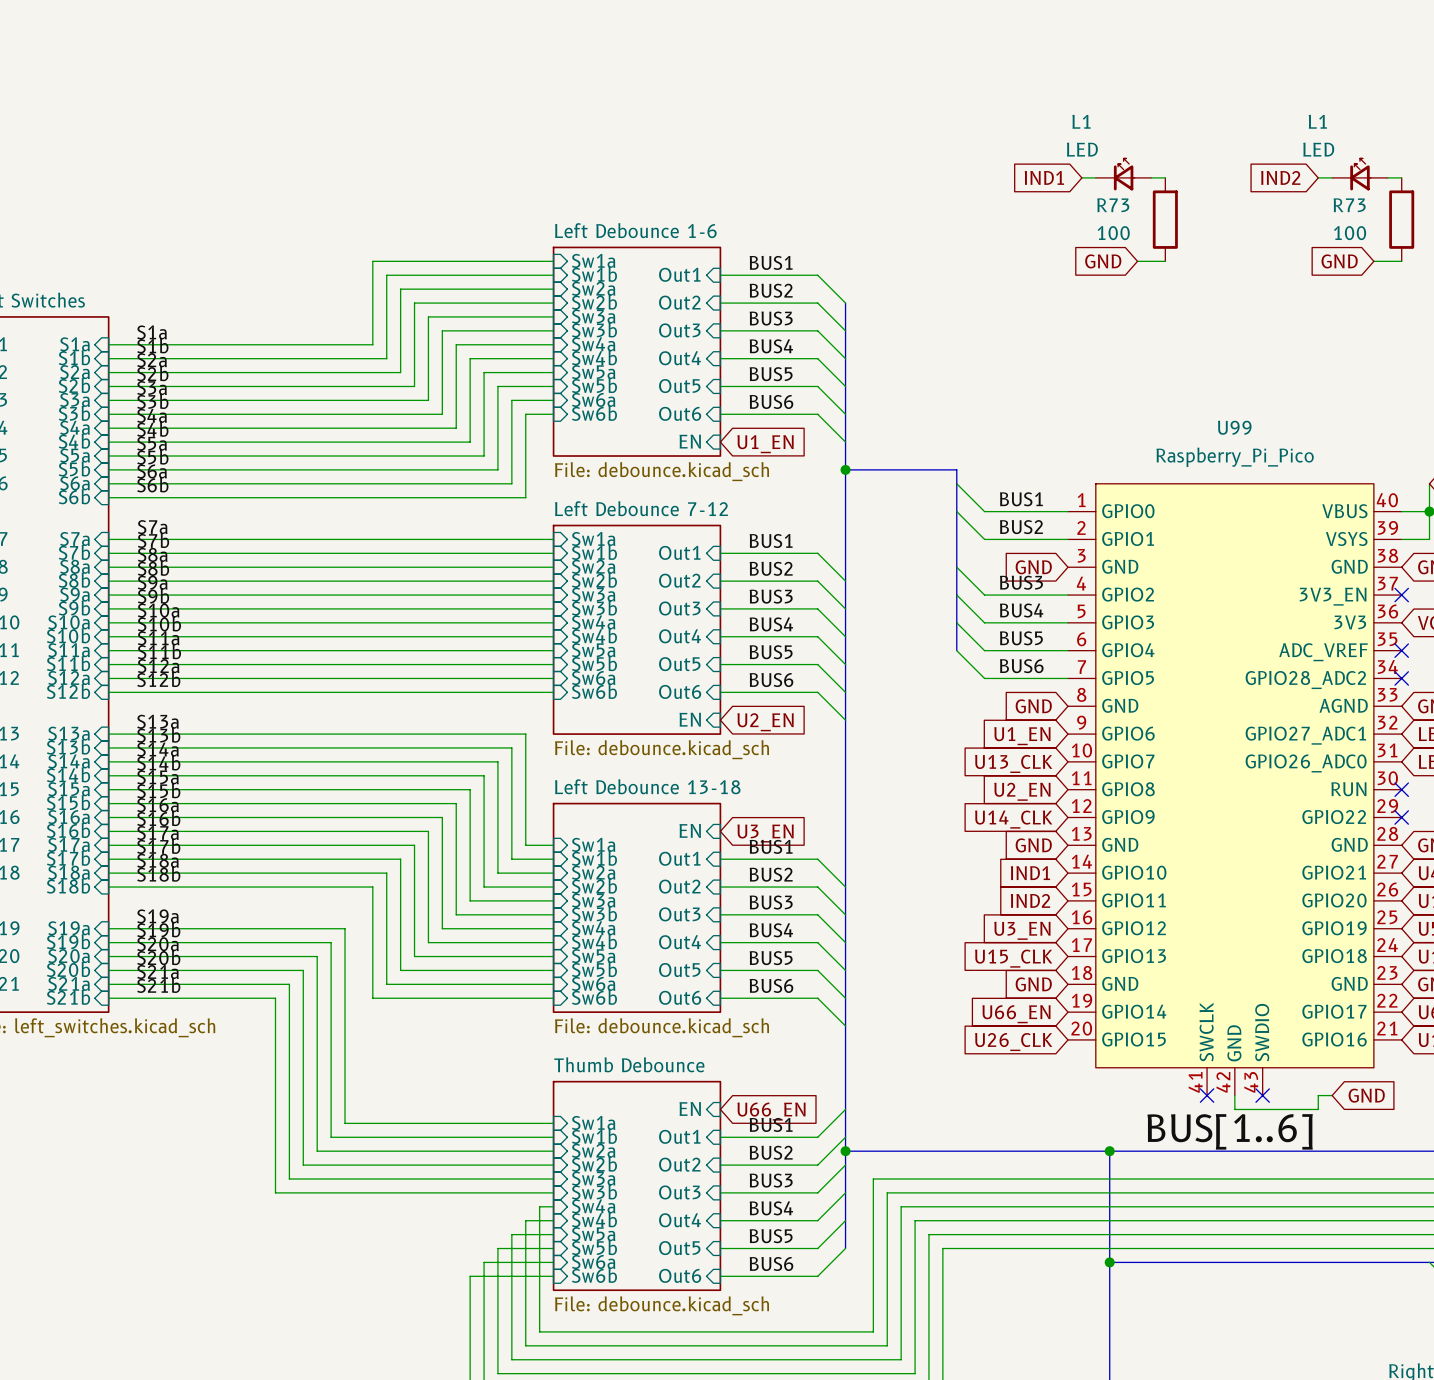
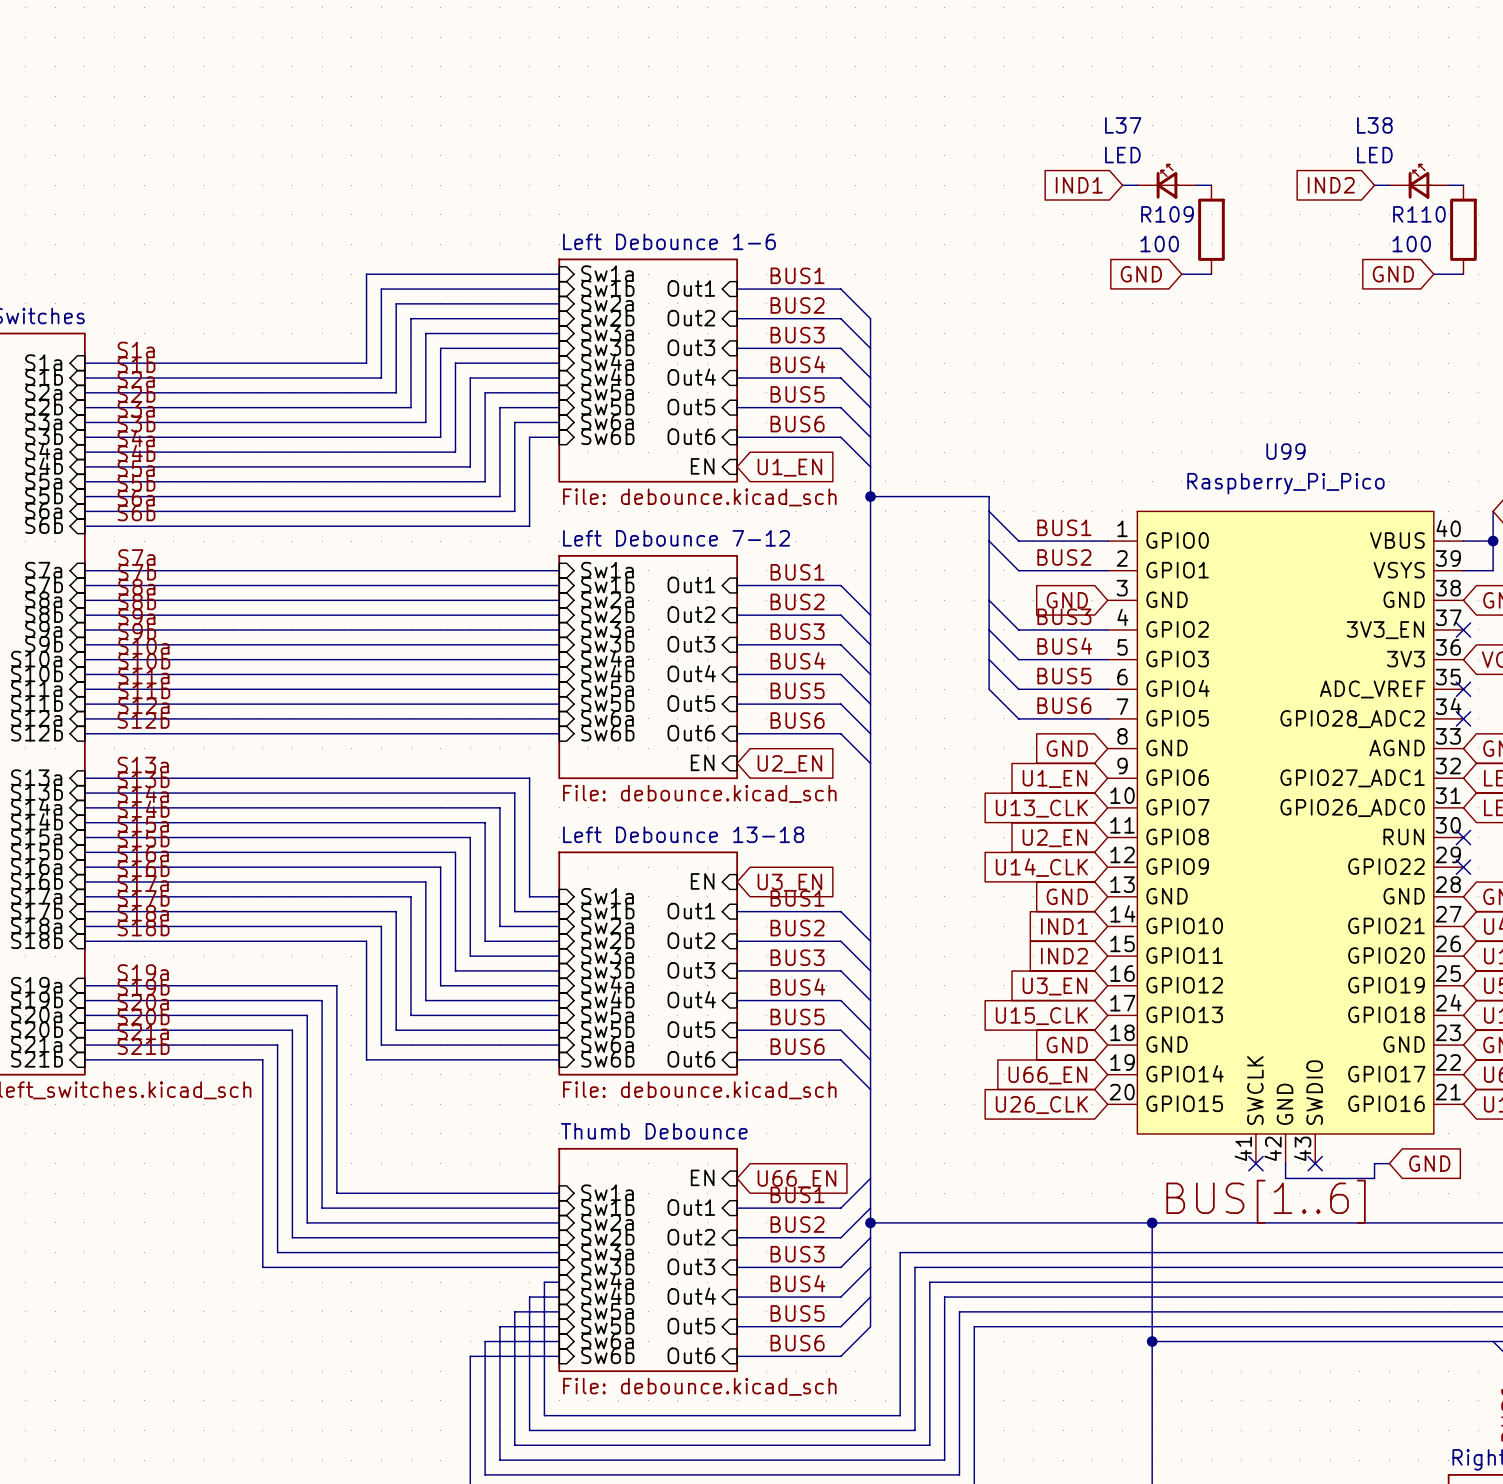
L1 name: L1 (1081, 121) -> L37 (1123, 125)
L1 name: L1 (1317, 121) -> L38 (1374, 125)
R73 name: R73 (1113, 205) -> R109 (1167, 214)
R73 name: R73 (1349, 205) -> R110 (1419, 214)

